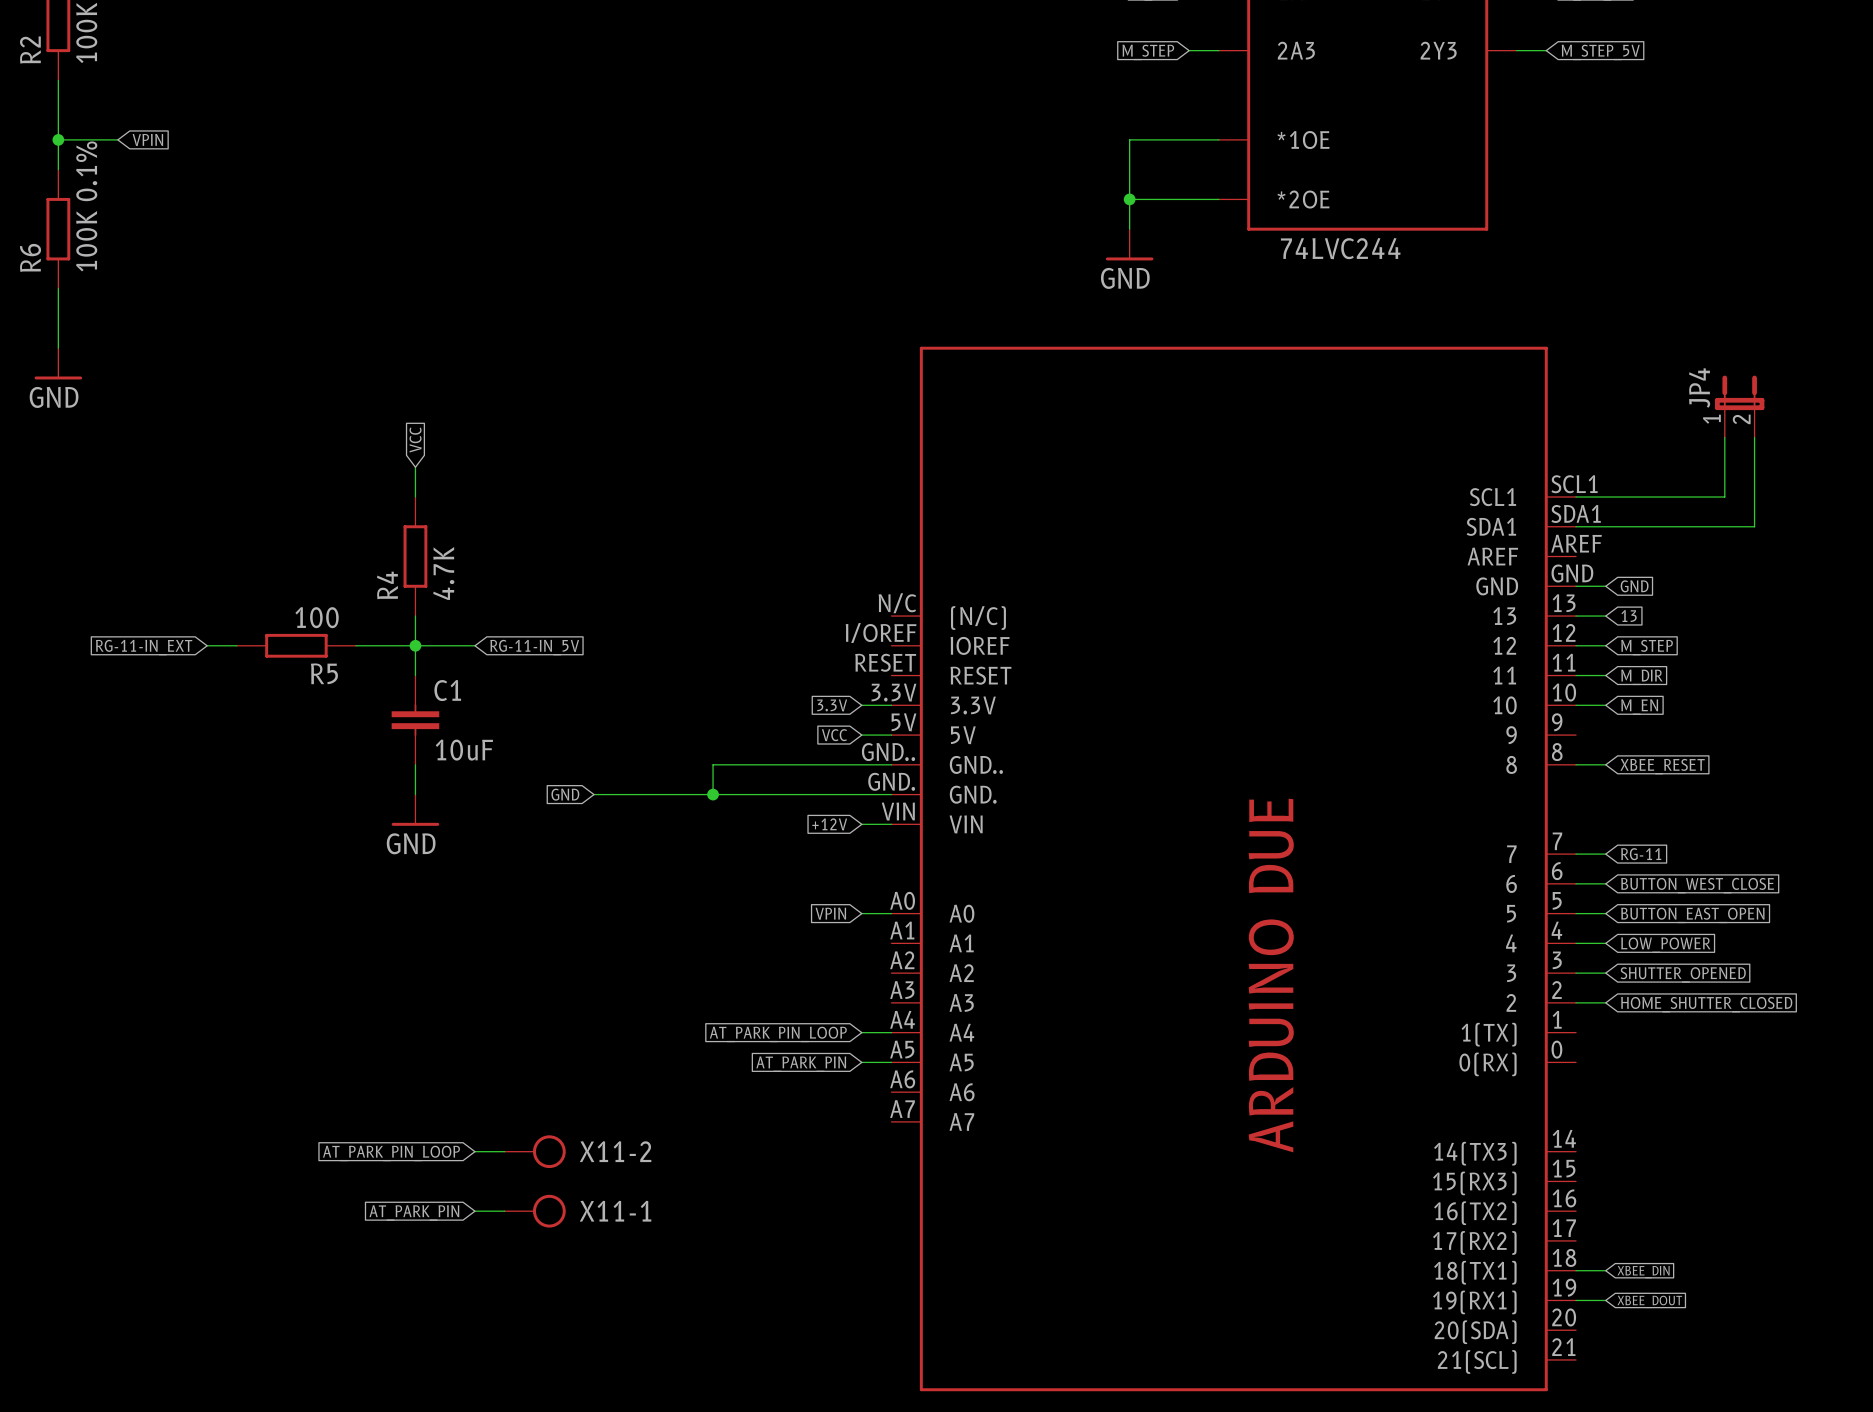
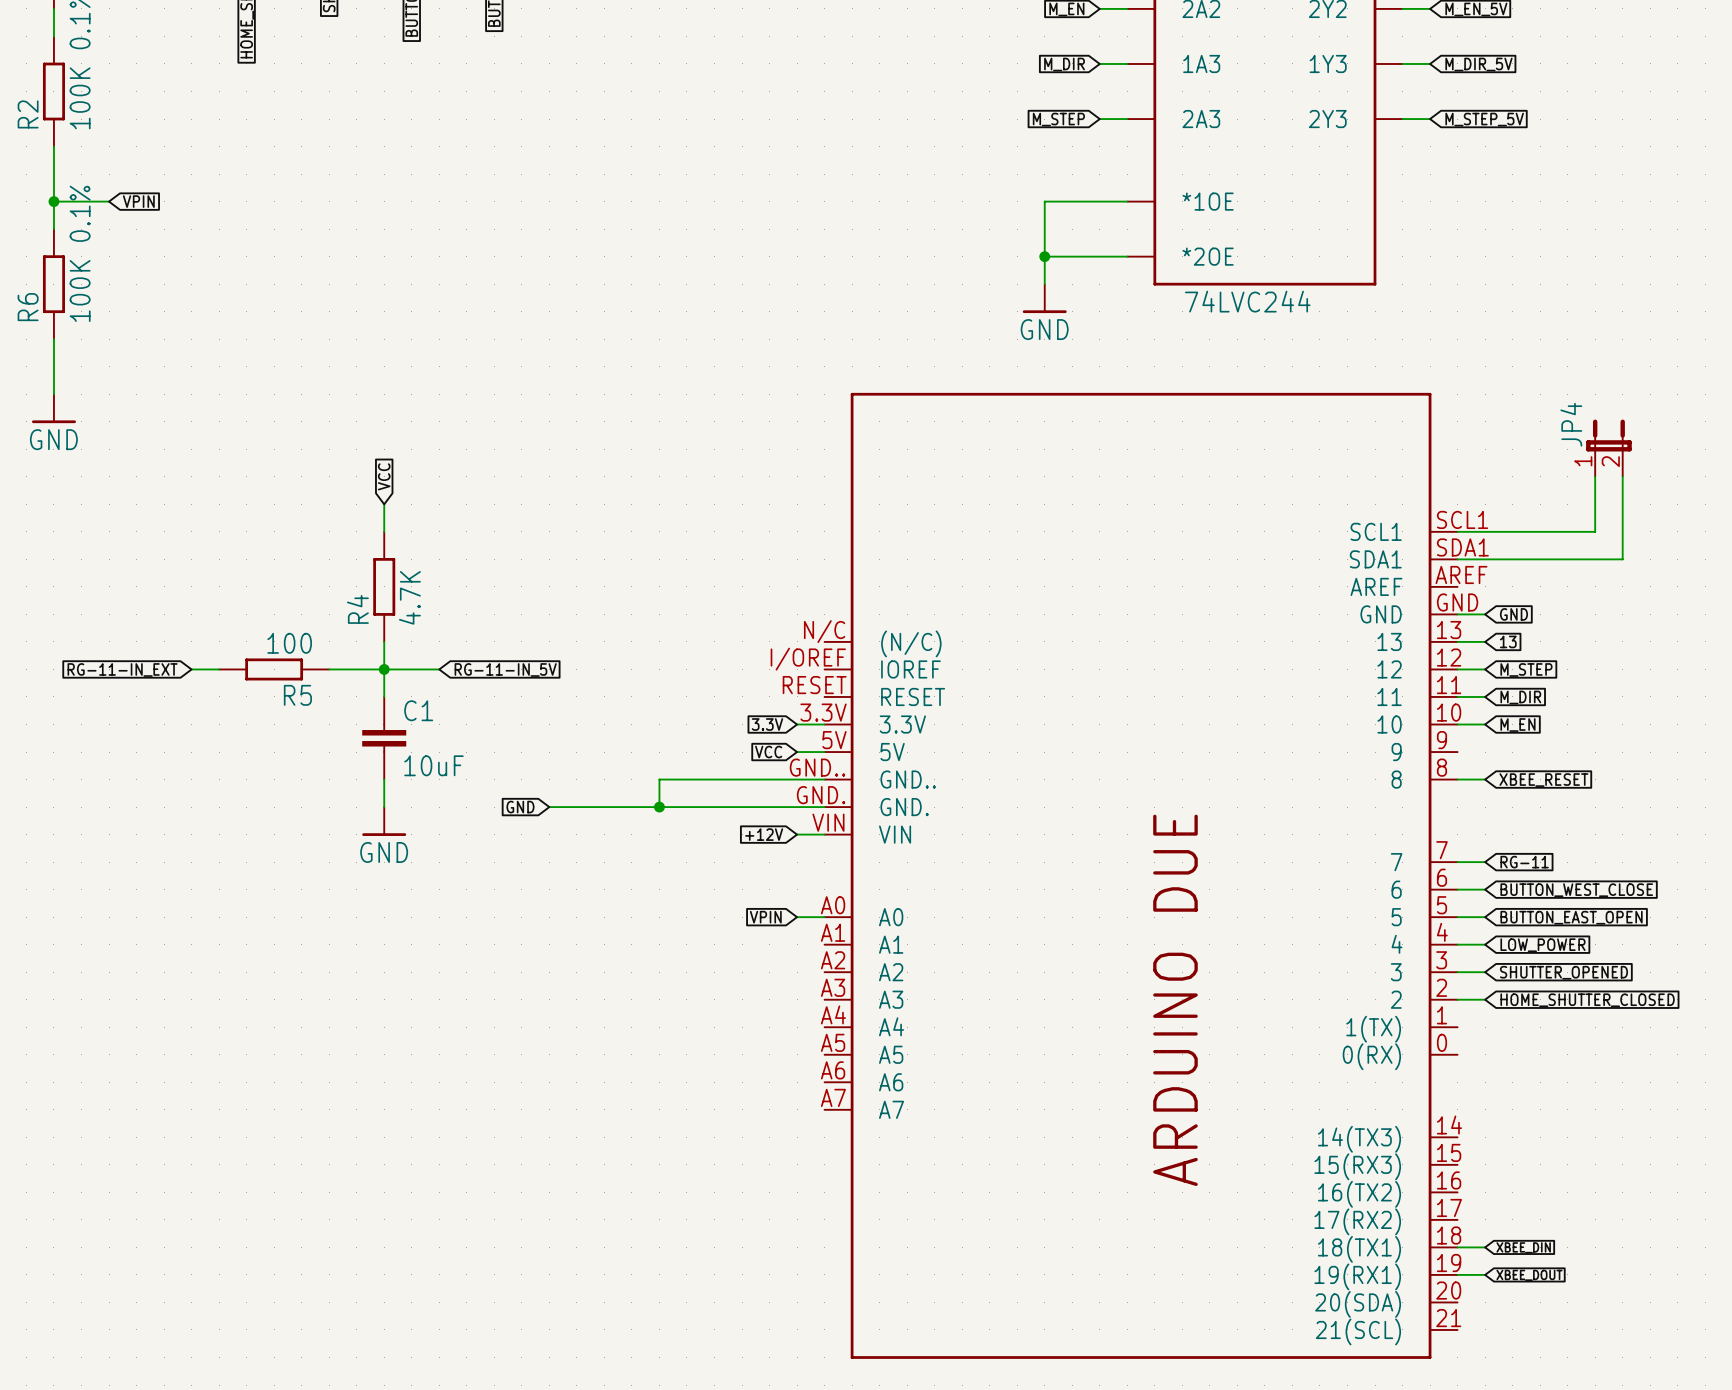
wire: (861, 1032) (891, 1032) -> none
global label: AT_PARK_PIN_LOOP (778, 1034) -> none
wire: (861, 1062) (891, 1062) -> none
global label: AT_PARK_PIN (801, 1064) -> none
wire: (474, 1151) (504, 1151) -> none
X11-2: (535, 1151) -> none
global label: AT_PARK_PIN_LOOP (391, 1153) -> none
wire: (474, 1211) (504, 1211) -> none
X11-1: (535, 1211) -> none
global label: AT_PARK_PIN (414, 1212) -> none

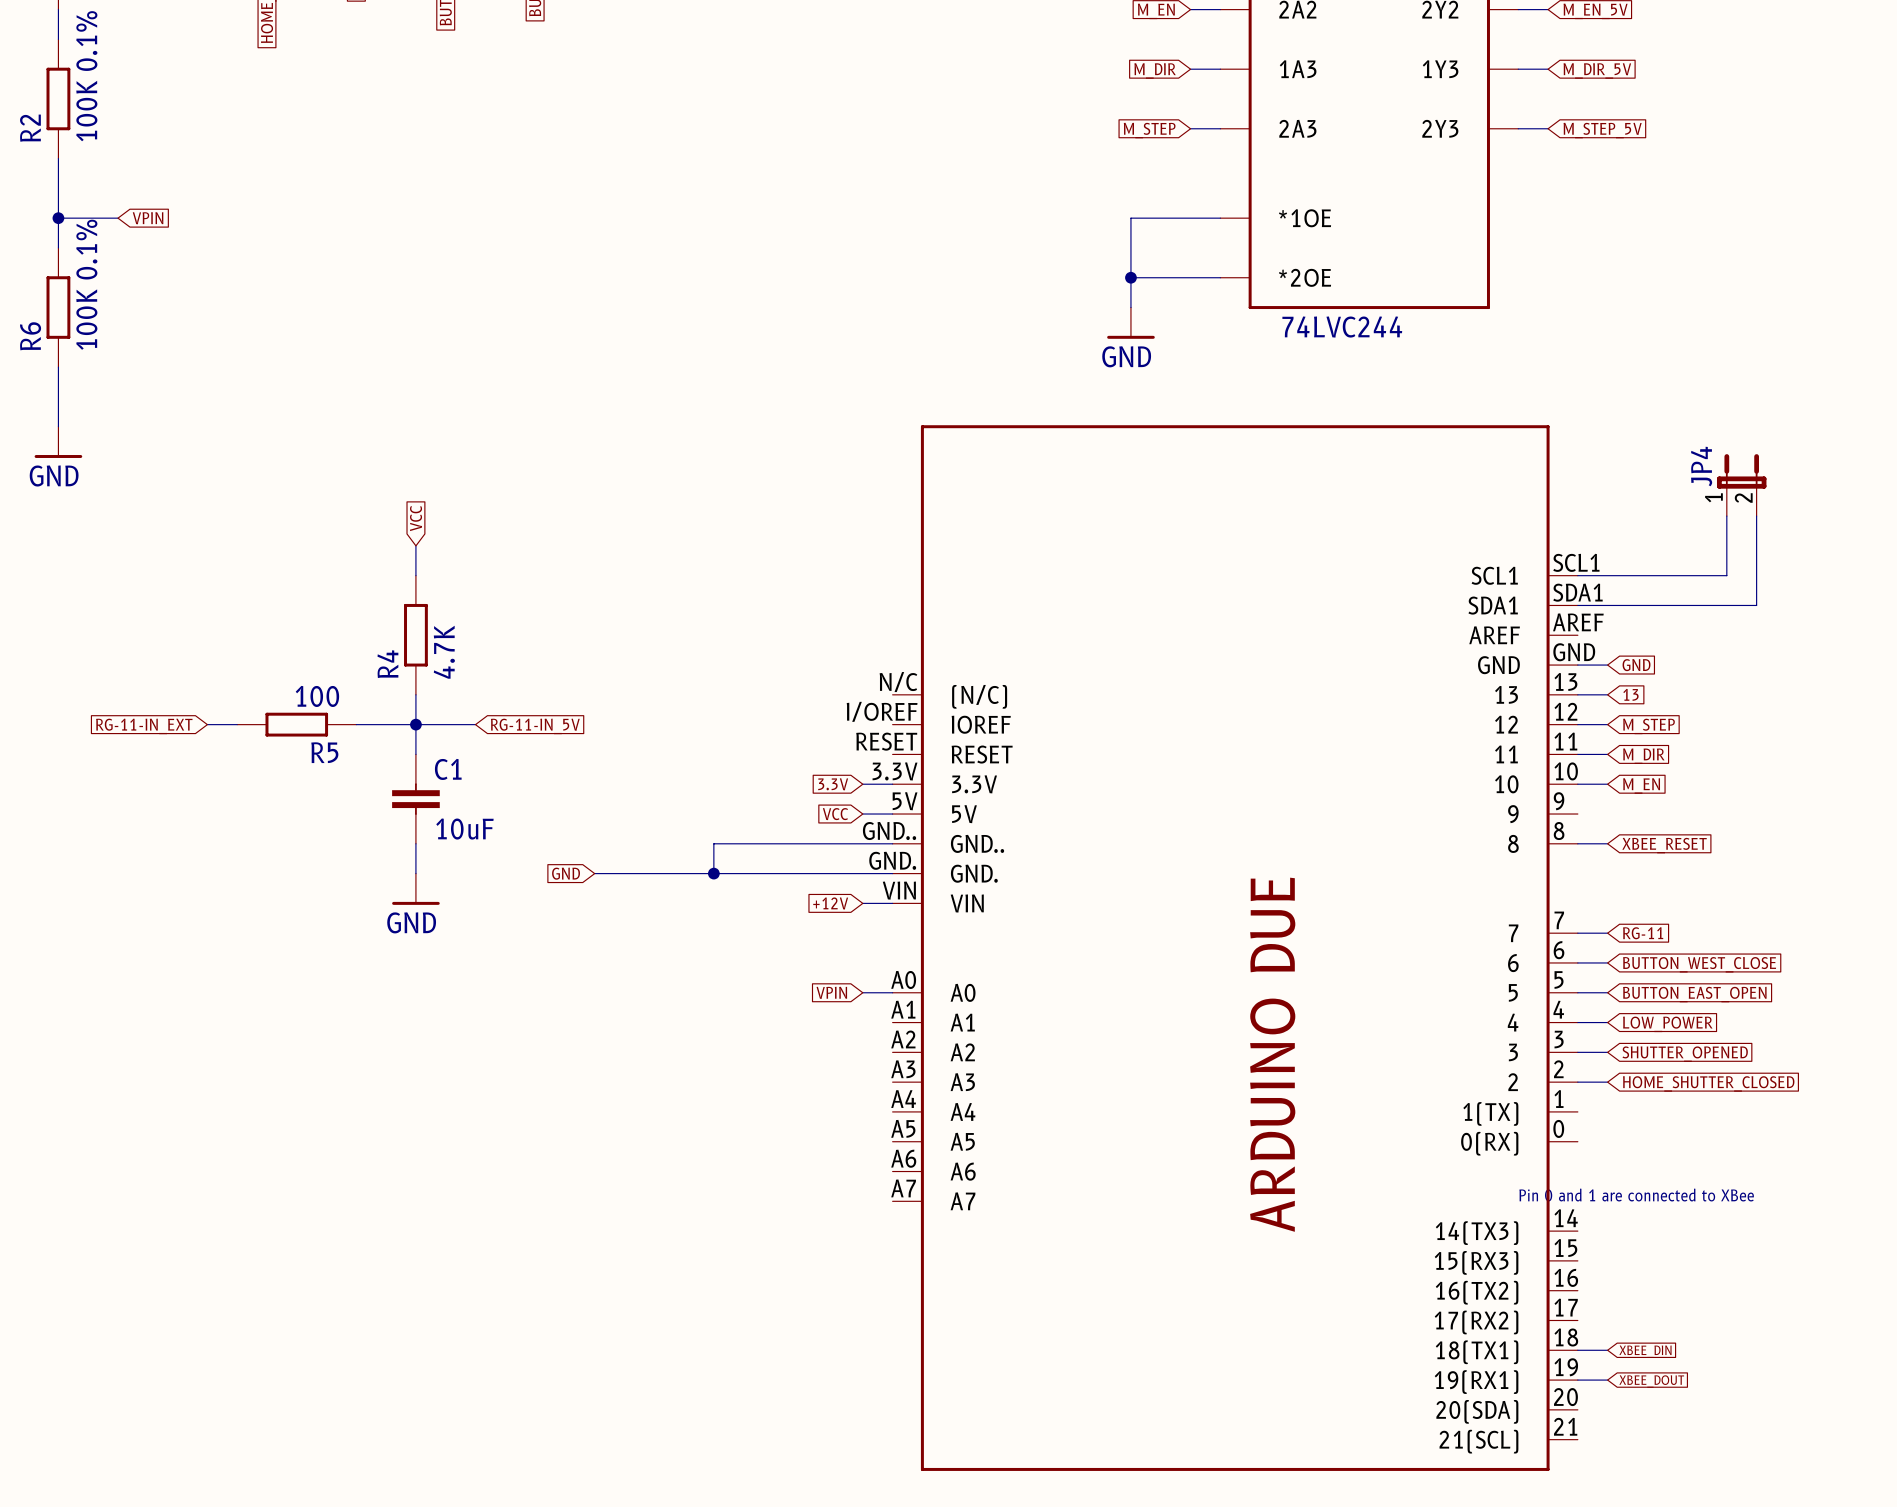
text: none -> Pin 0 and 1 are connected to XBee (1636, 1195)

